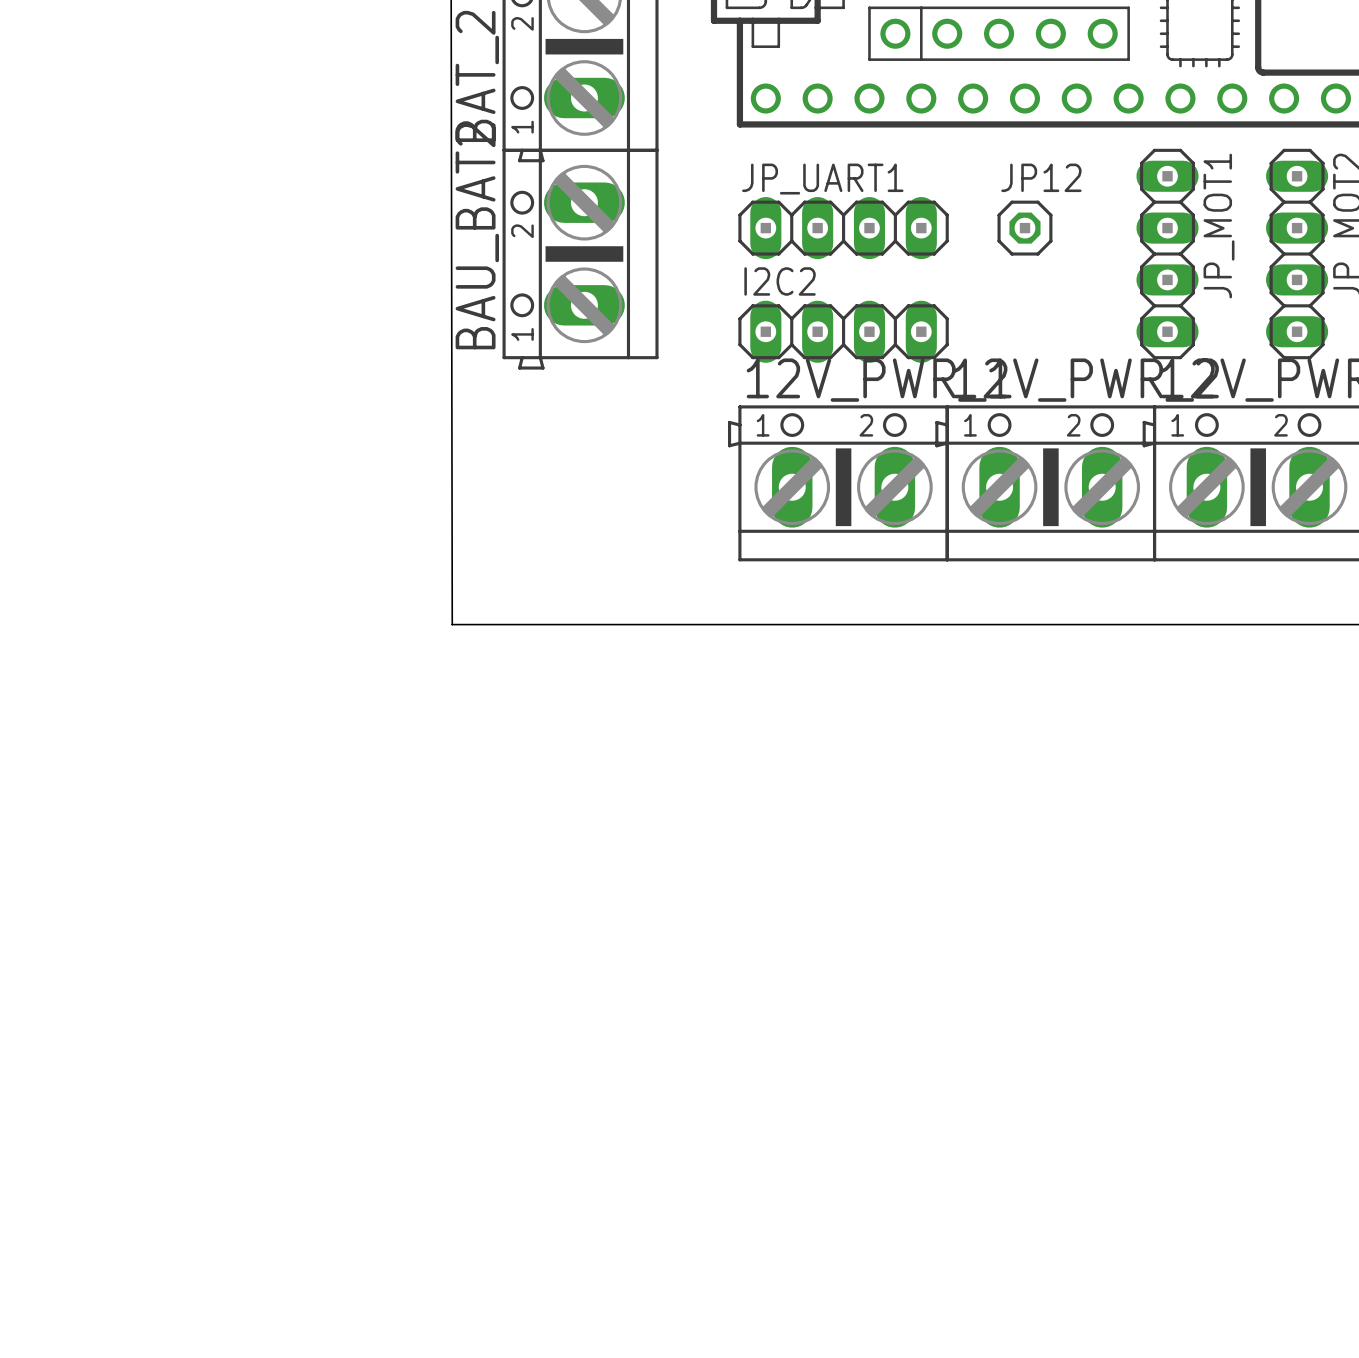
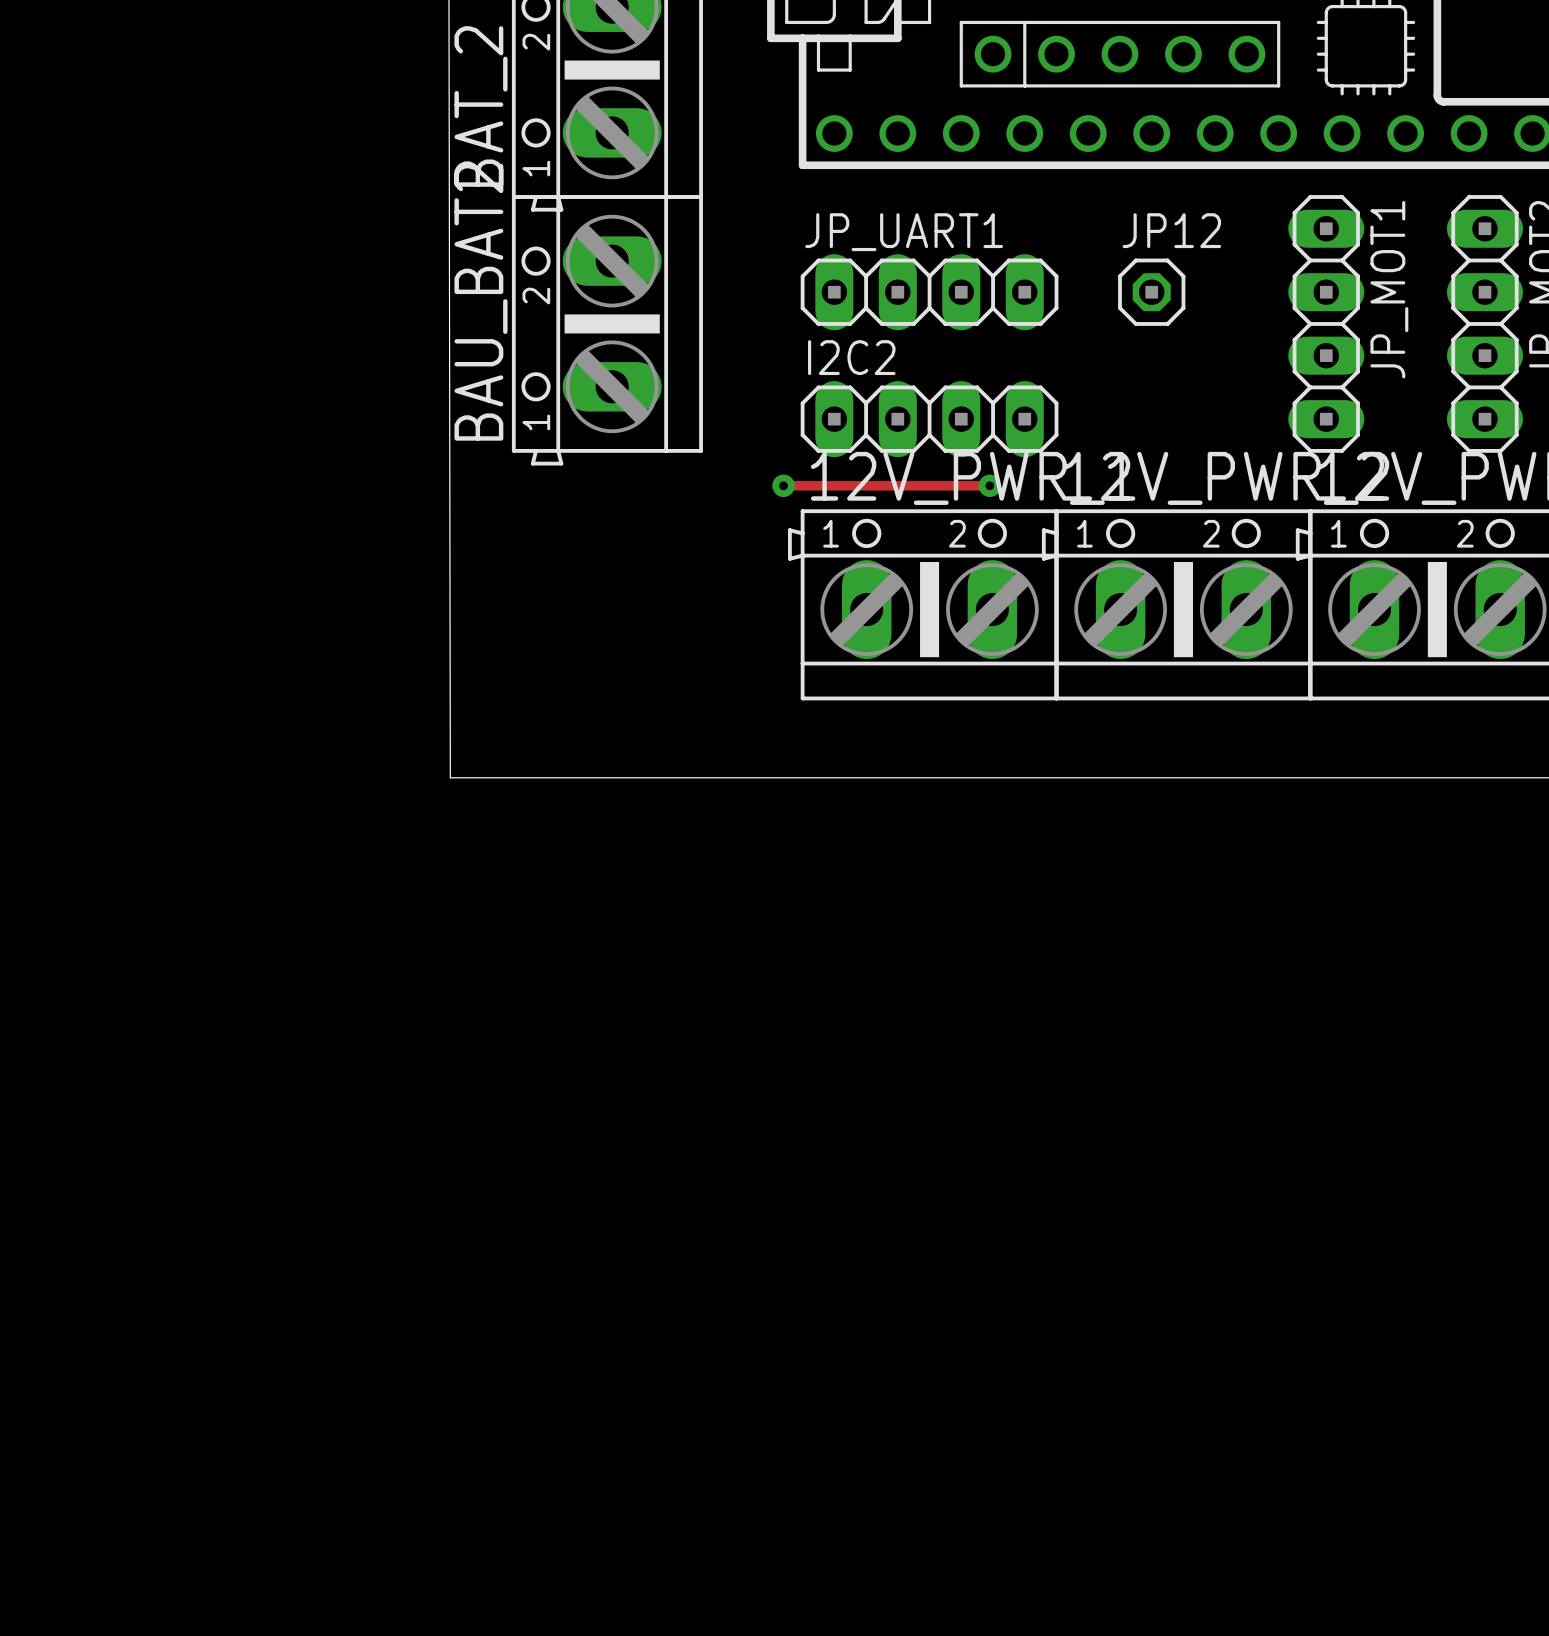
track: none -> (783, 485) (989, 485)
via: none -> (783, 485)
via: none -> (989, 485)

